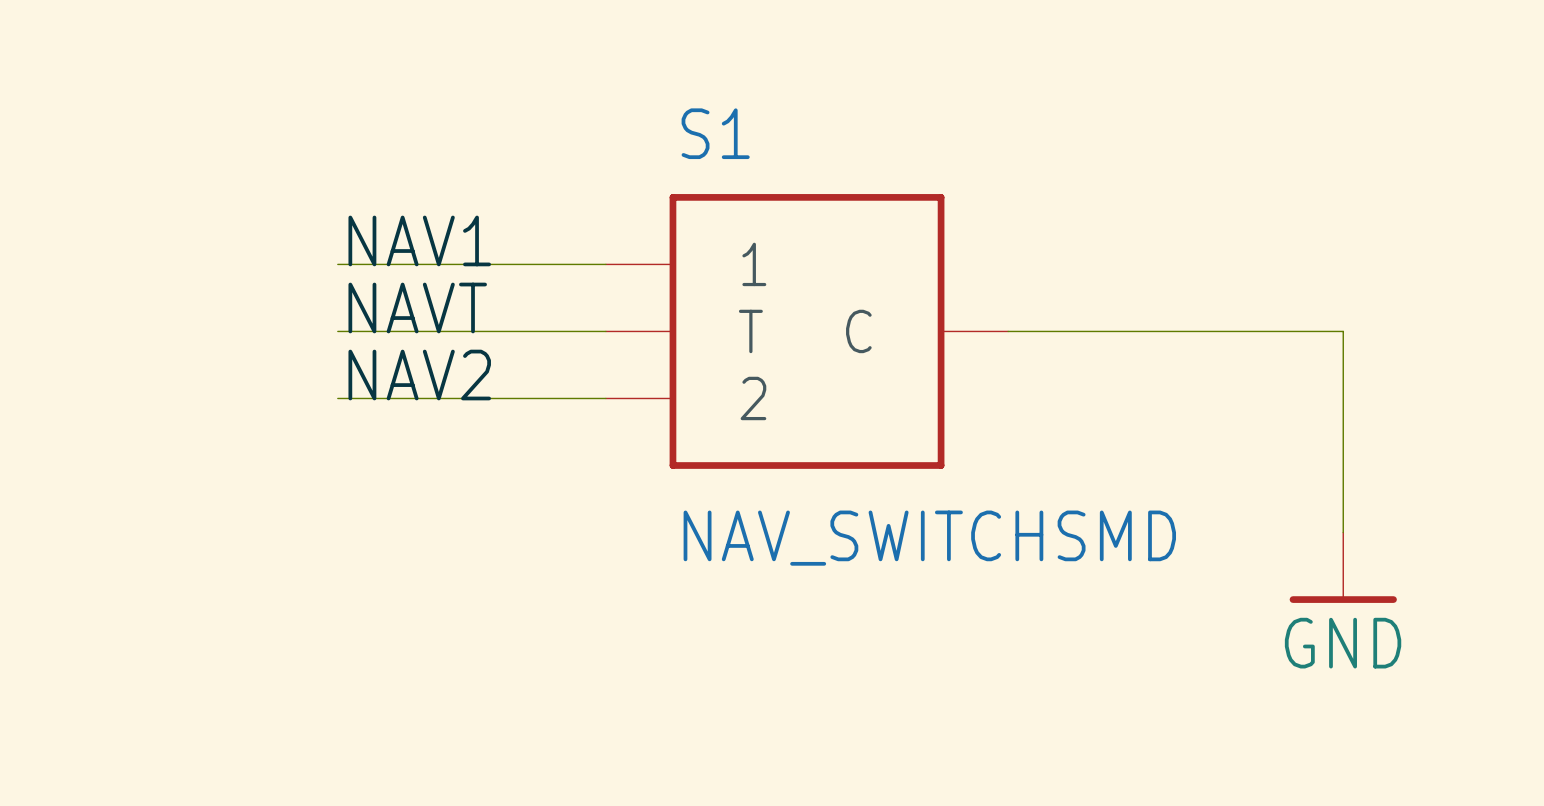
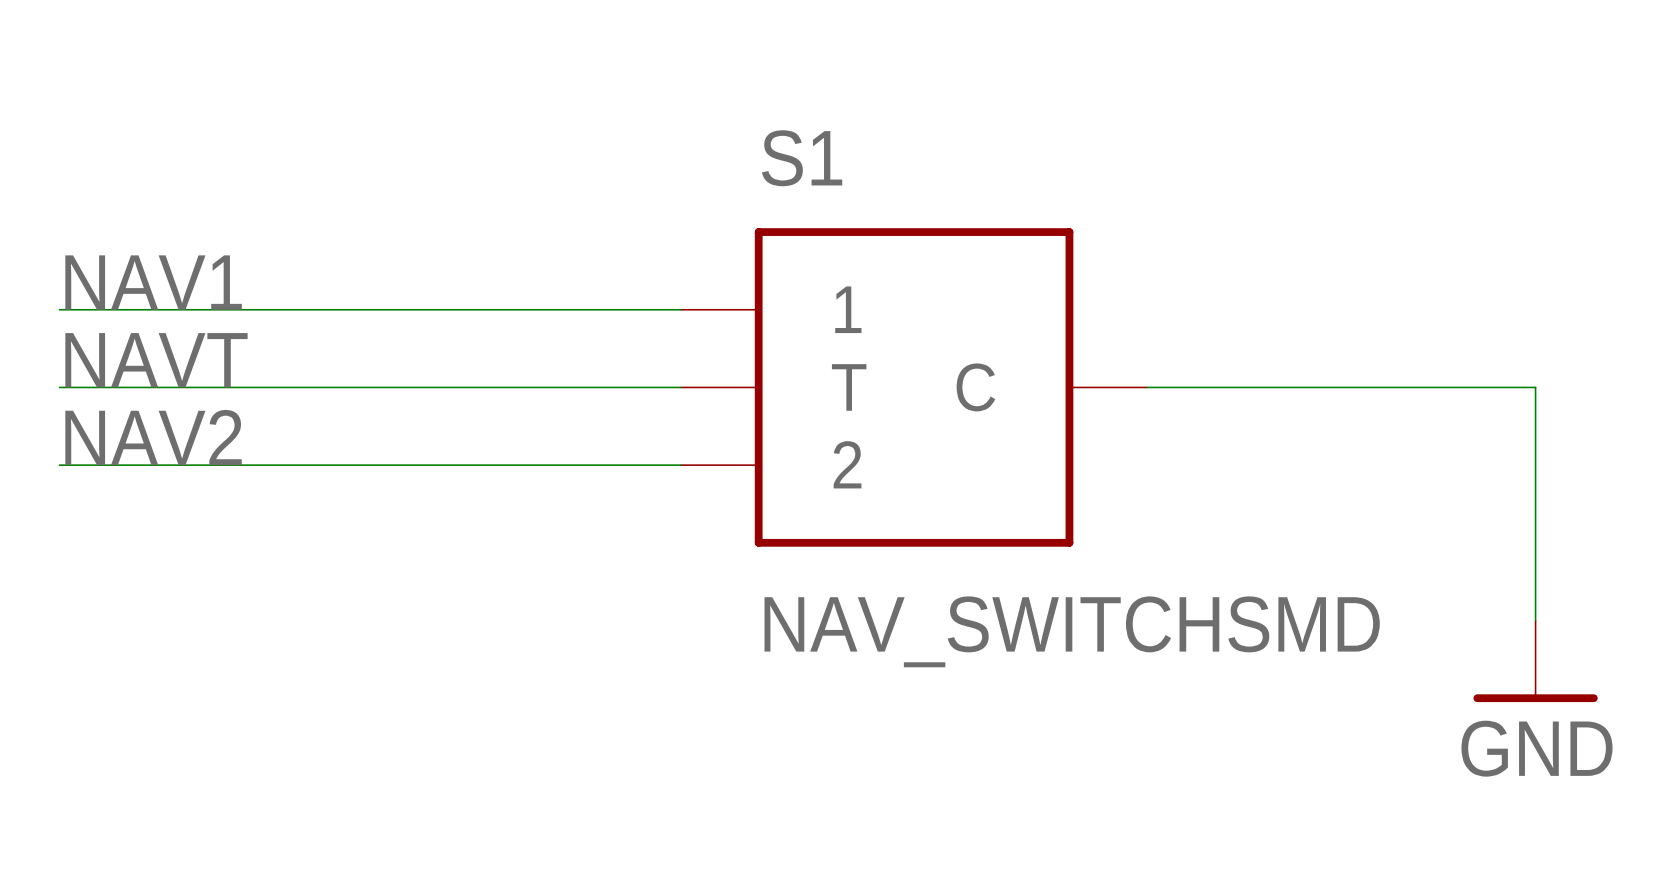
label position: NAV1 (419, 240) -> NAV1 (153, 282)
wire: none -> (59, 309) (370, 309)
label position: NAVT (417, 307) -> NAVT (156, 360)
wire: none -> (59, 387) (370, 387)
label position: NAV2 (419, 375) -> NAV2 (153, 437)
wire: none -> (59, 465) (370, 465)

